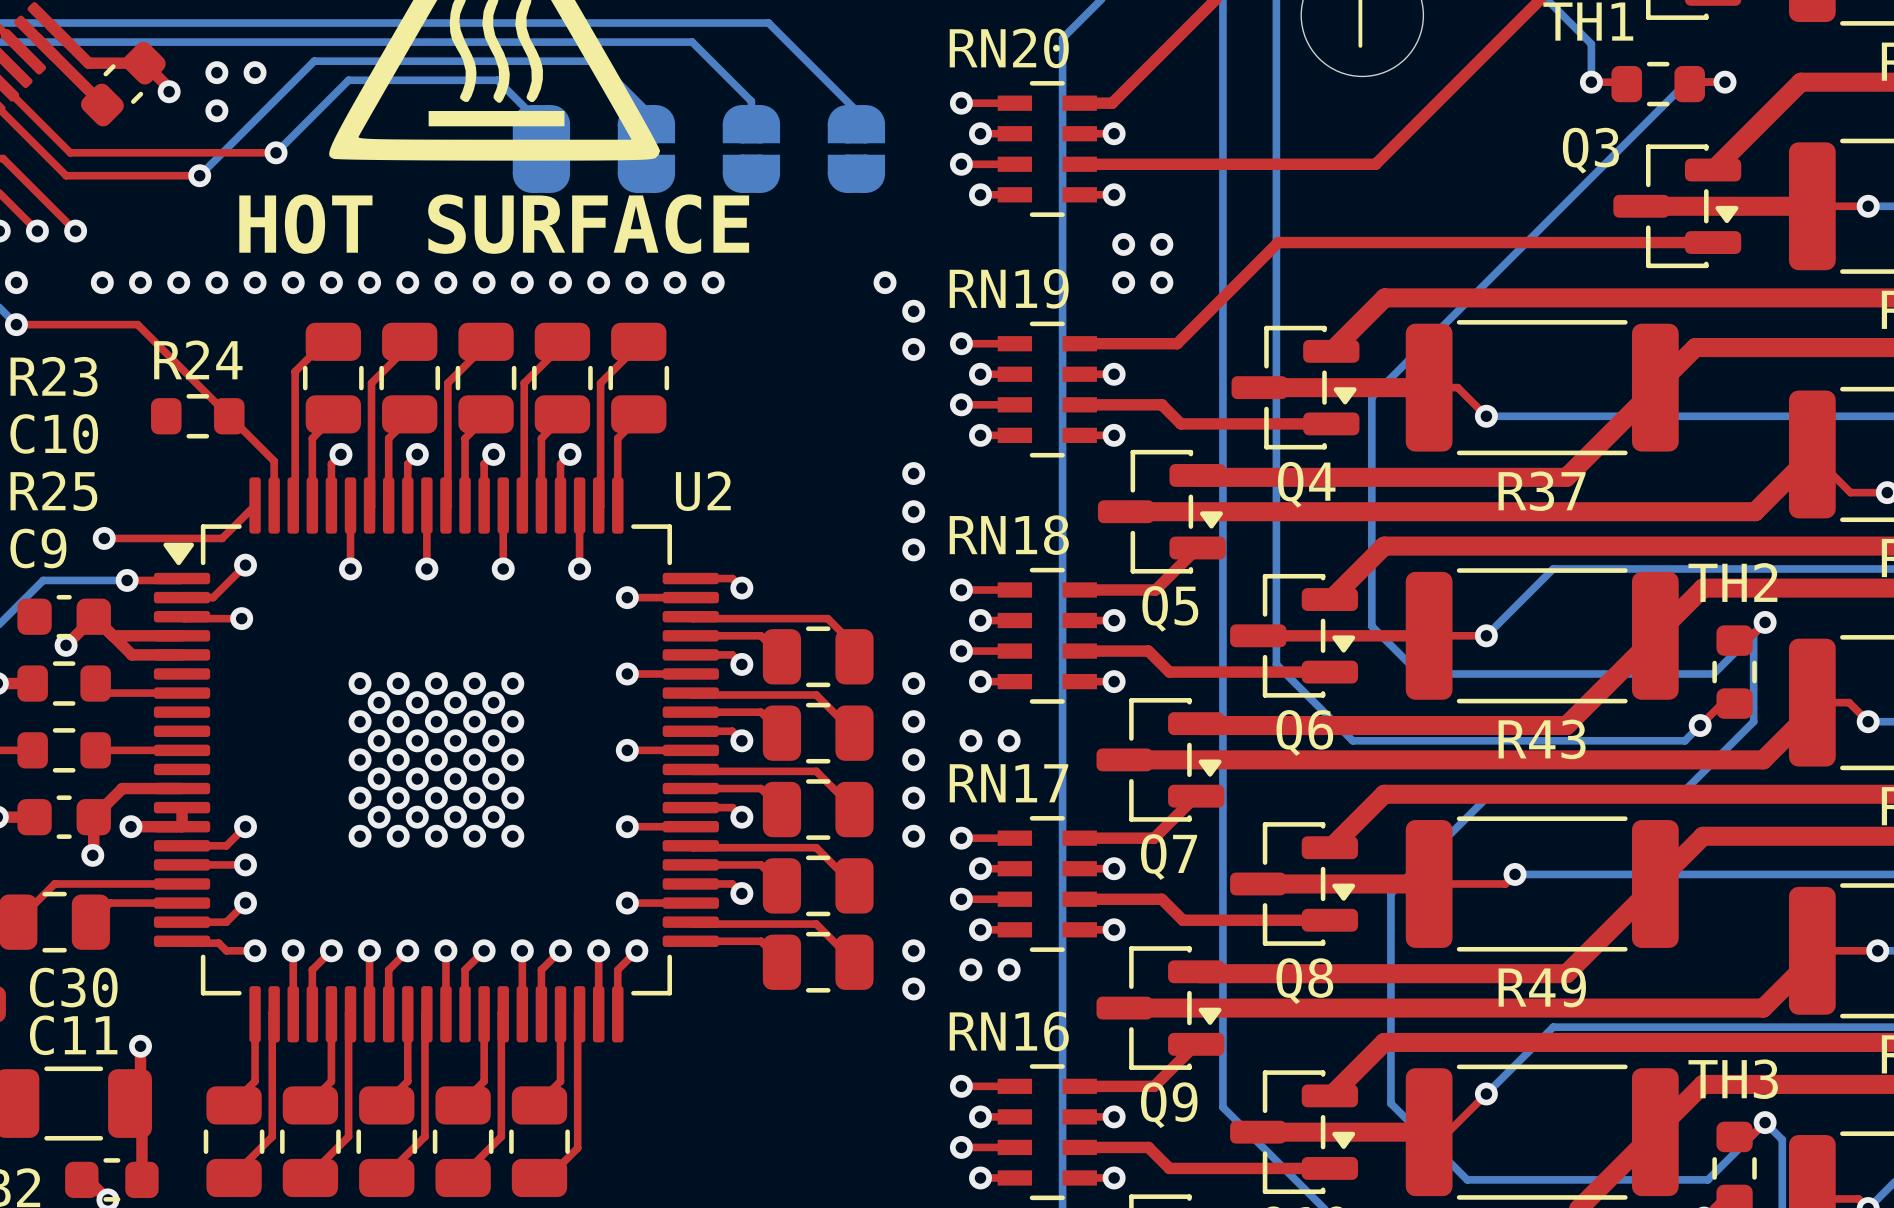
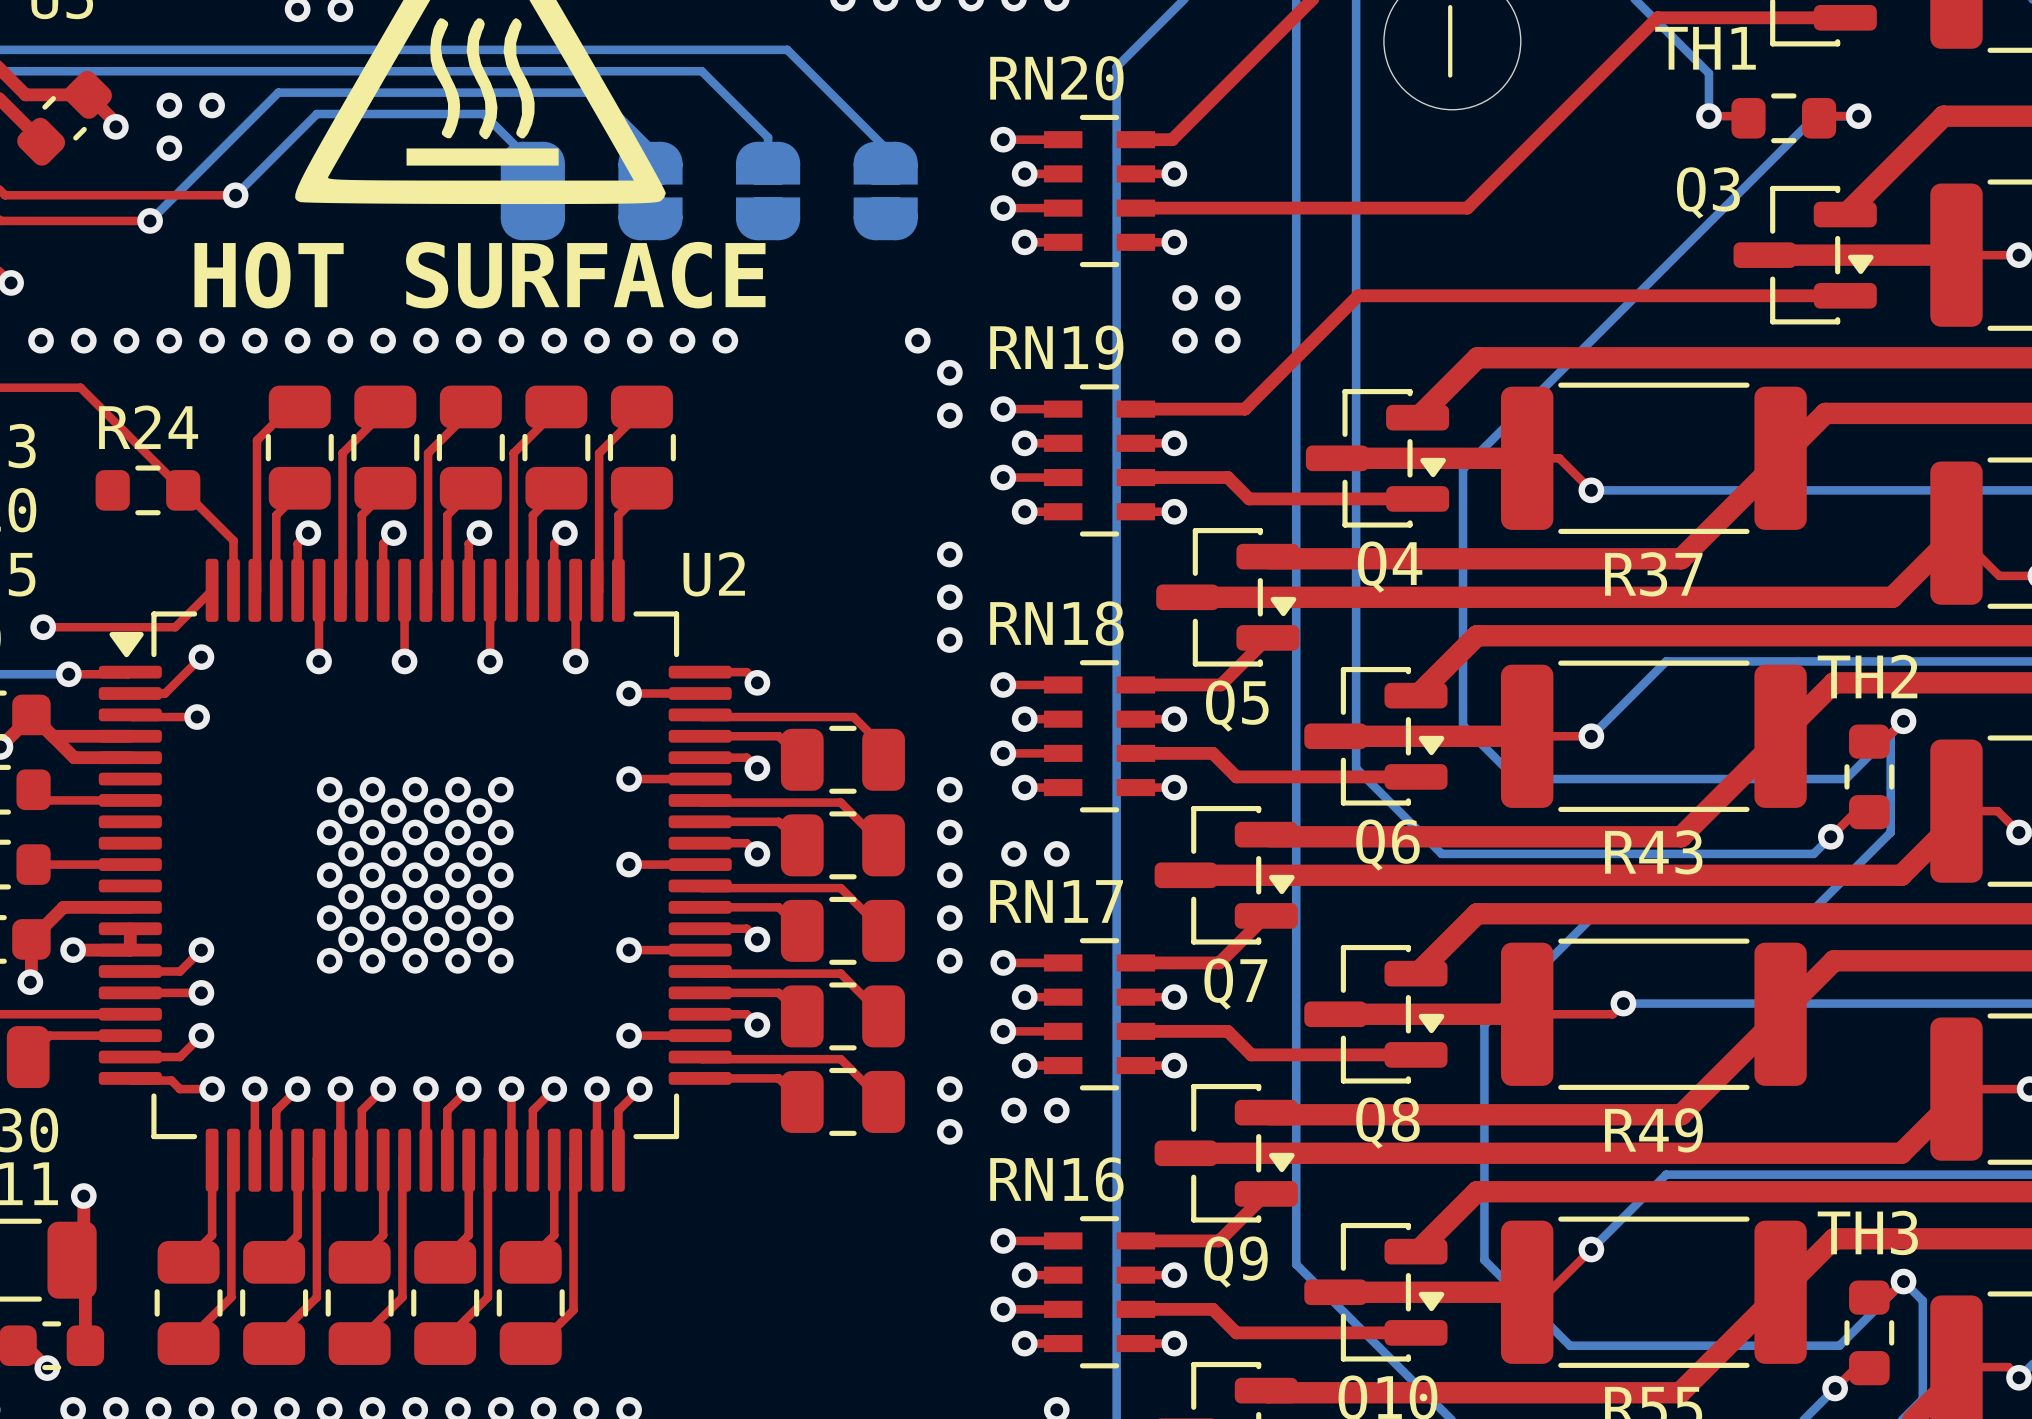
top track width: thin (1258, 635) (1429, 635) -> thick (1335, 736) (1527, 736)

